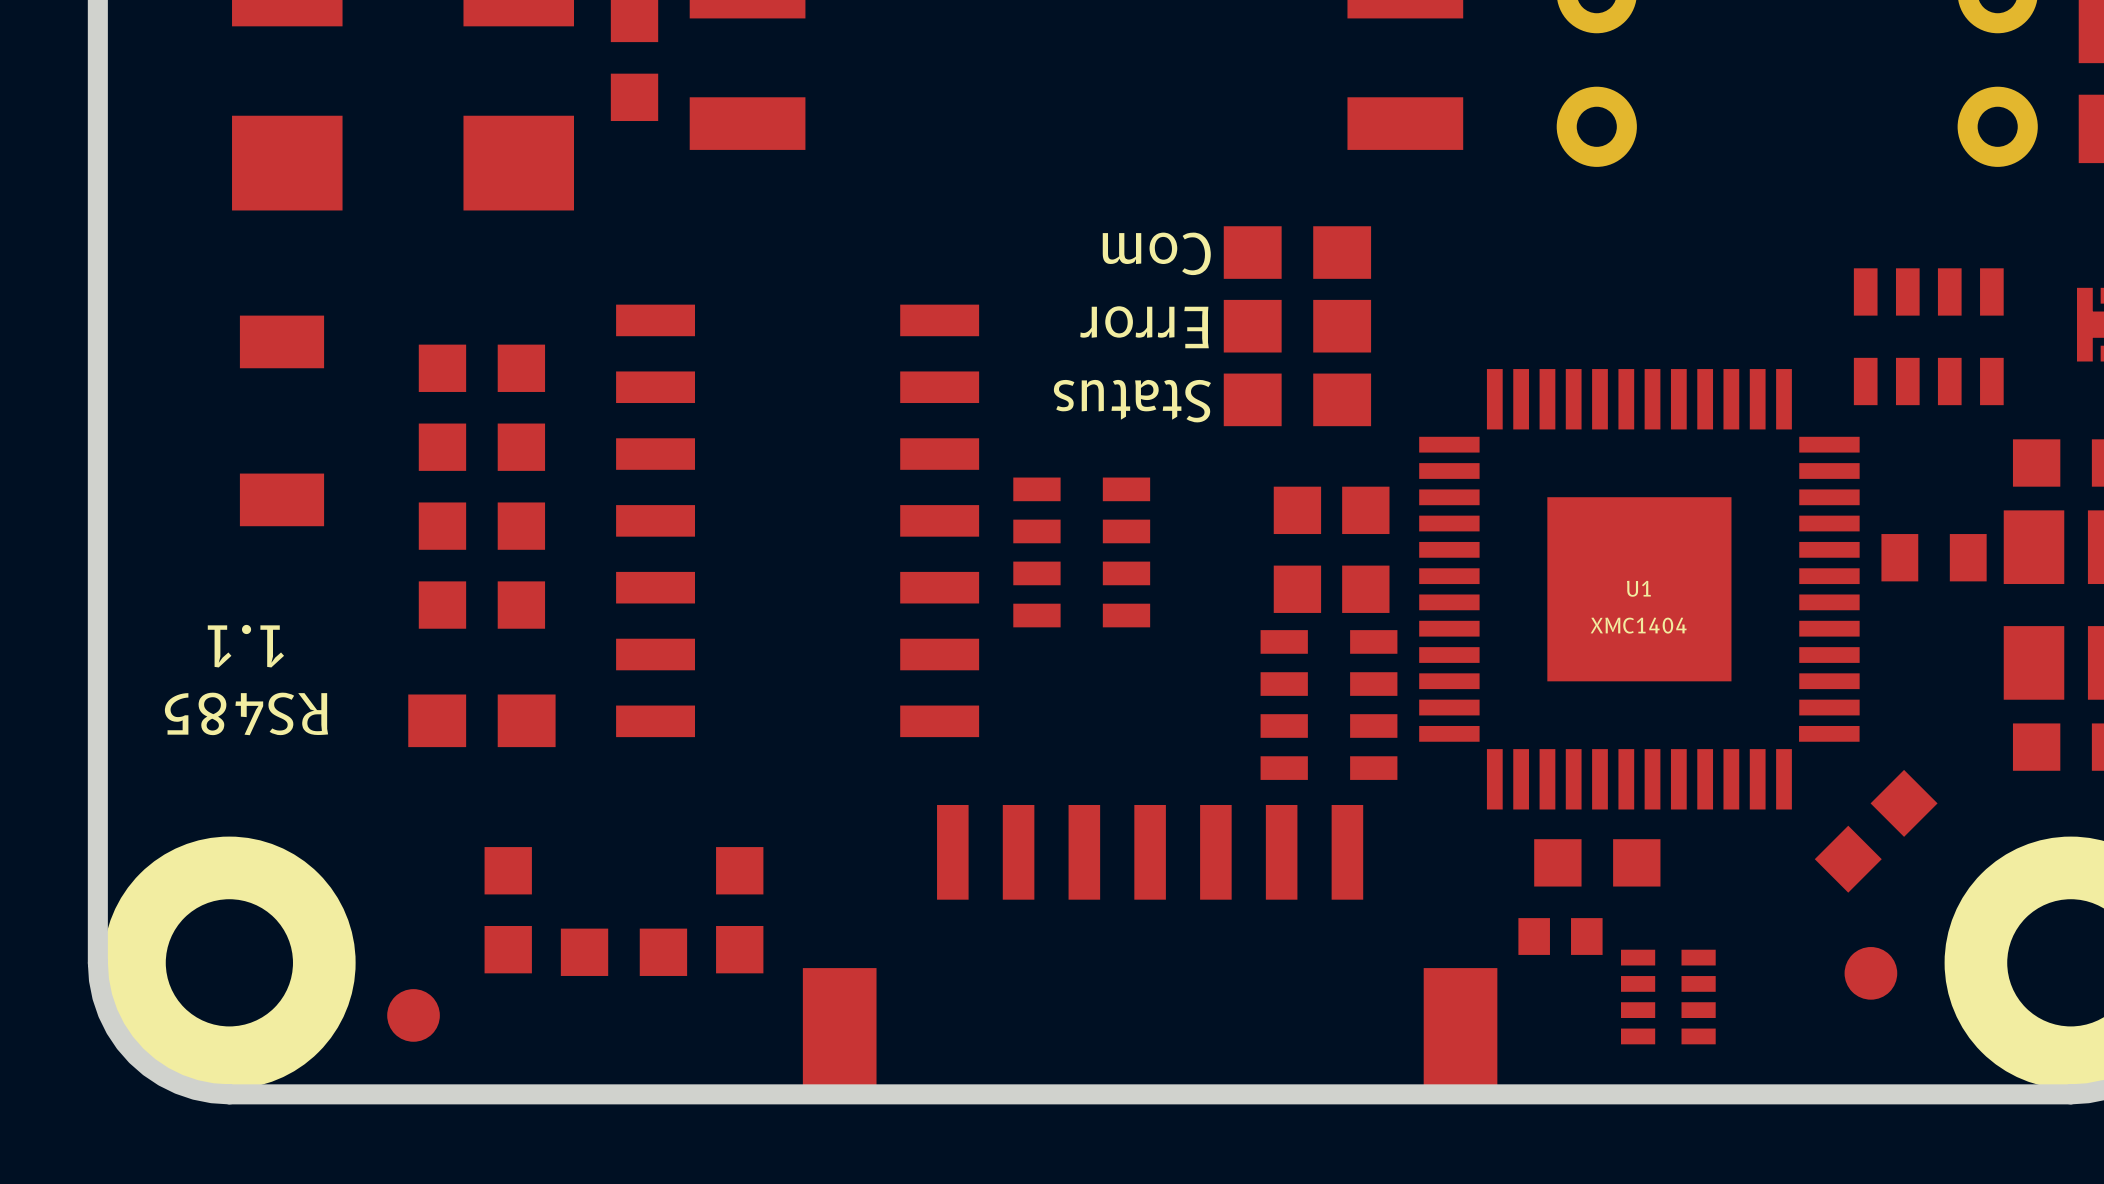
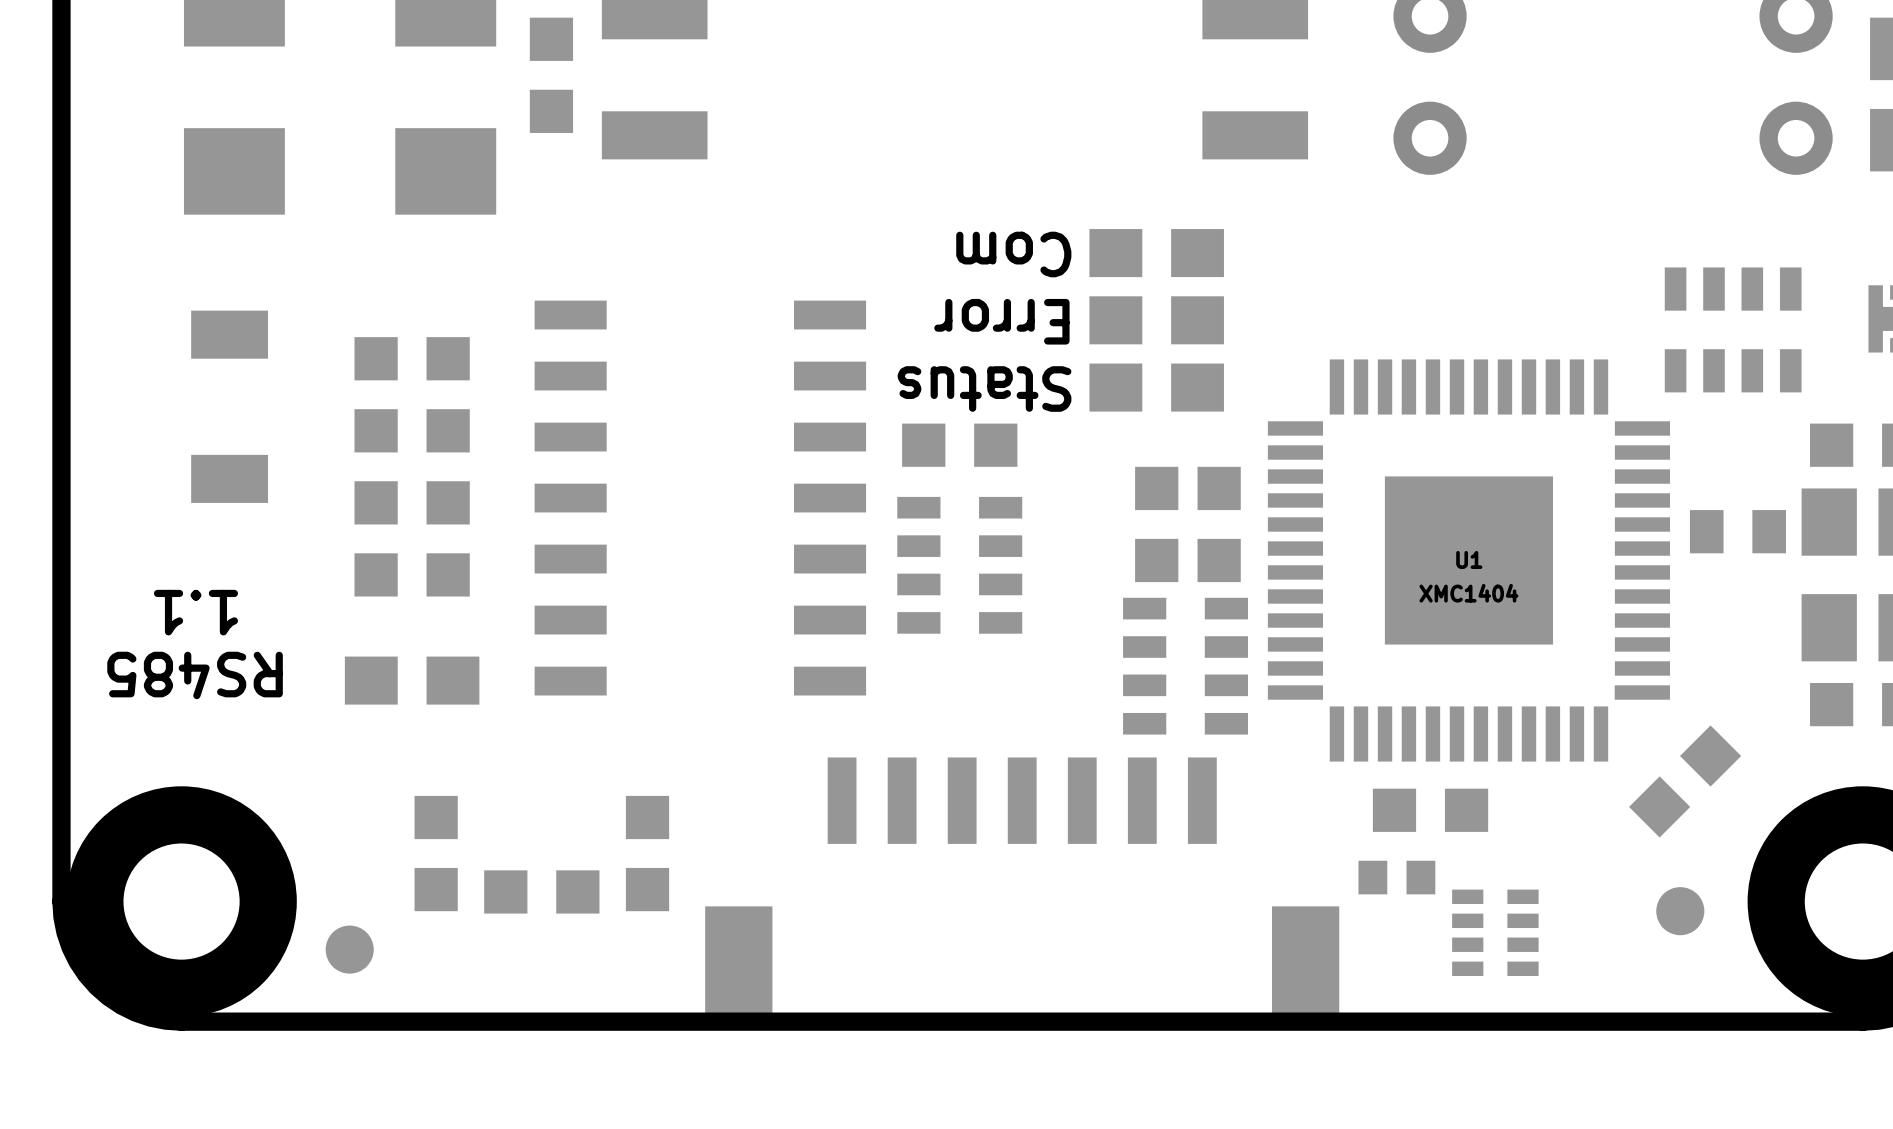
part: none -> (959, 445)
part position: (1081, 552) -> (959, 565)

